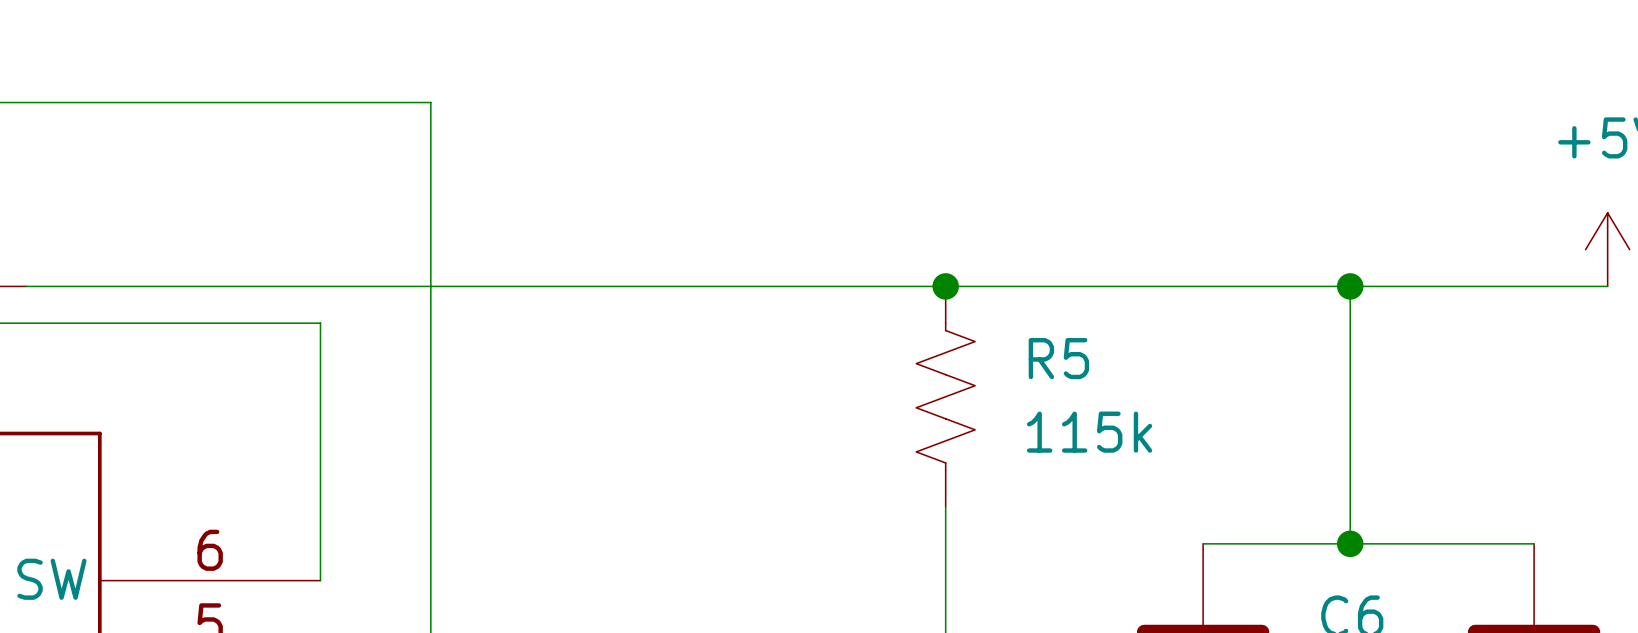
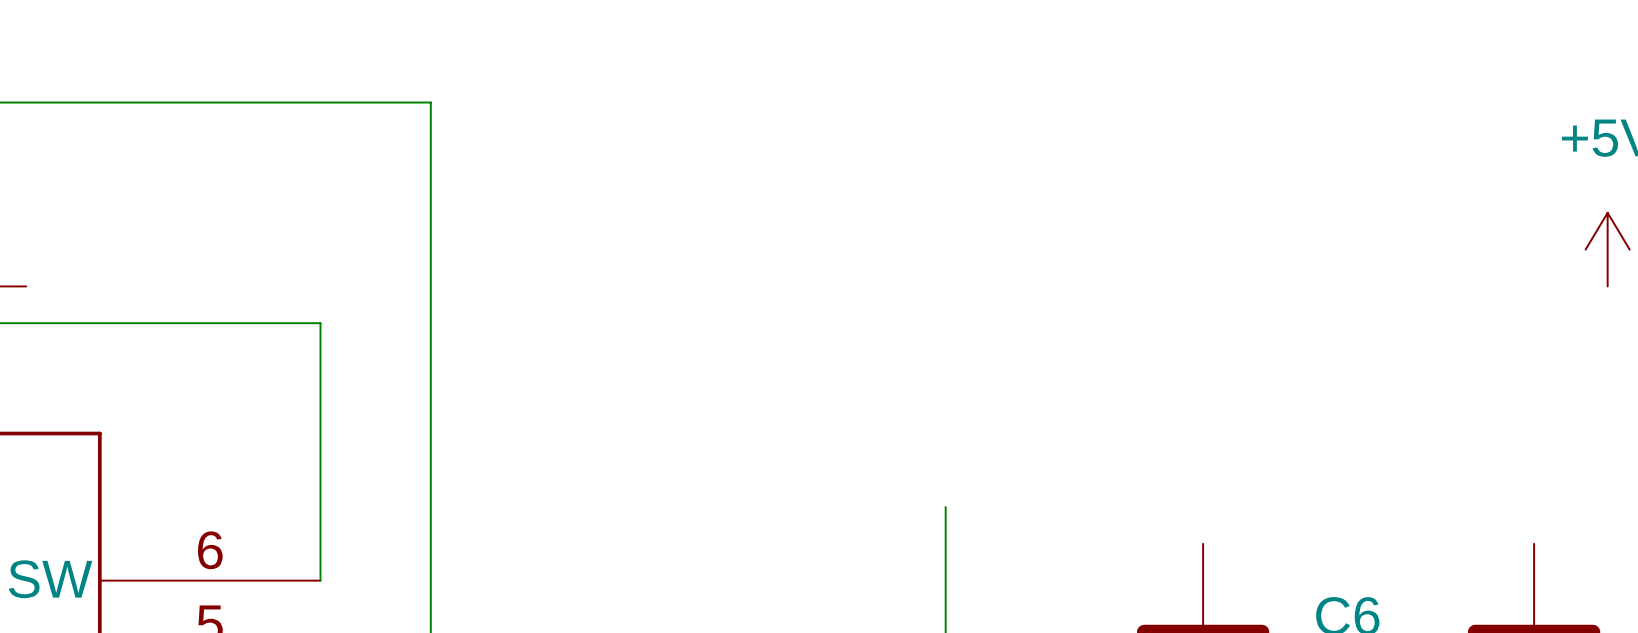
wire: (26, 286) (1607, 286) -> none
junction: (945, 286) -> none
wire: (1350, 286) (1350, 543) -> none
junction: (1350, 286) -> none
R5: 115k (945, 396) -> none
wire: (1203, 543) (1534, 543) -> none
junction: (1350, 543) -> none

